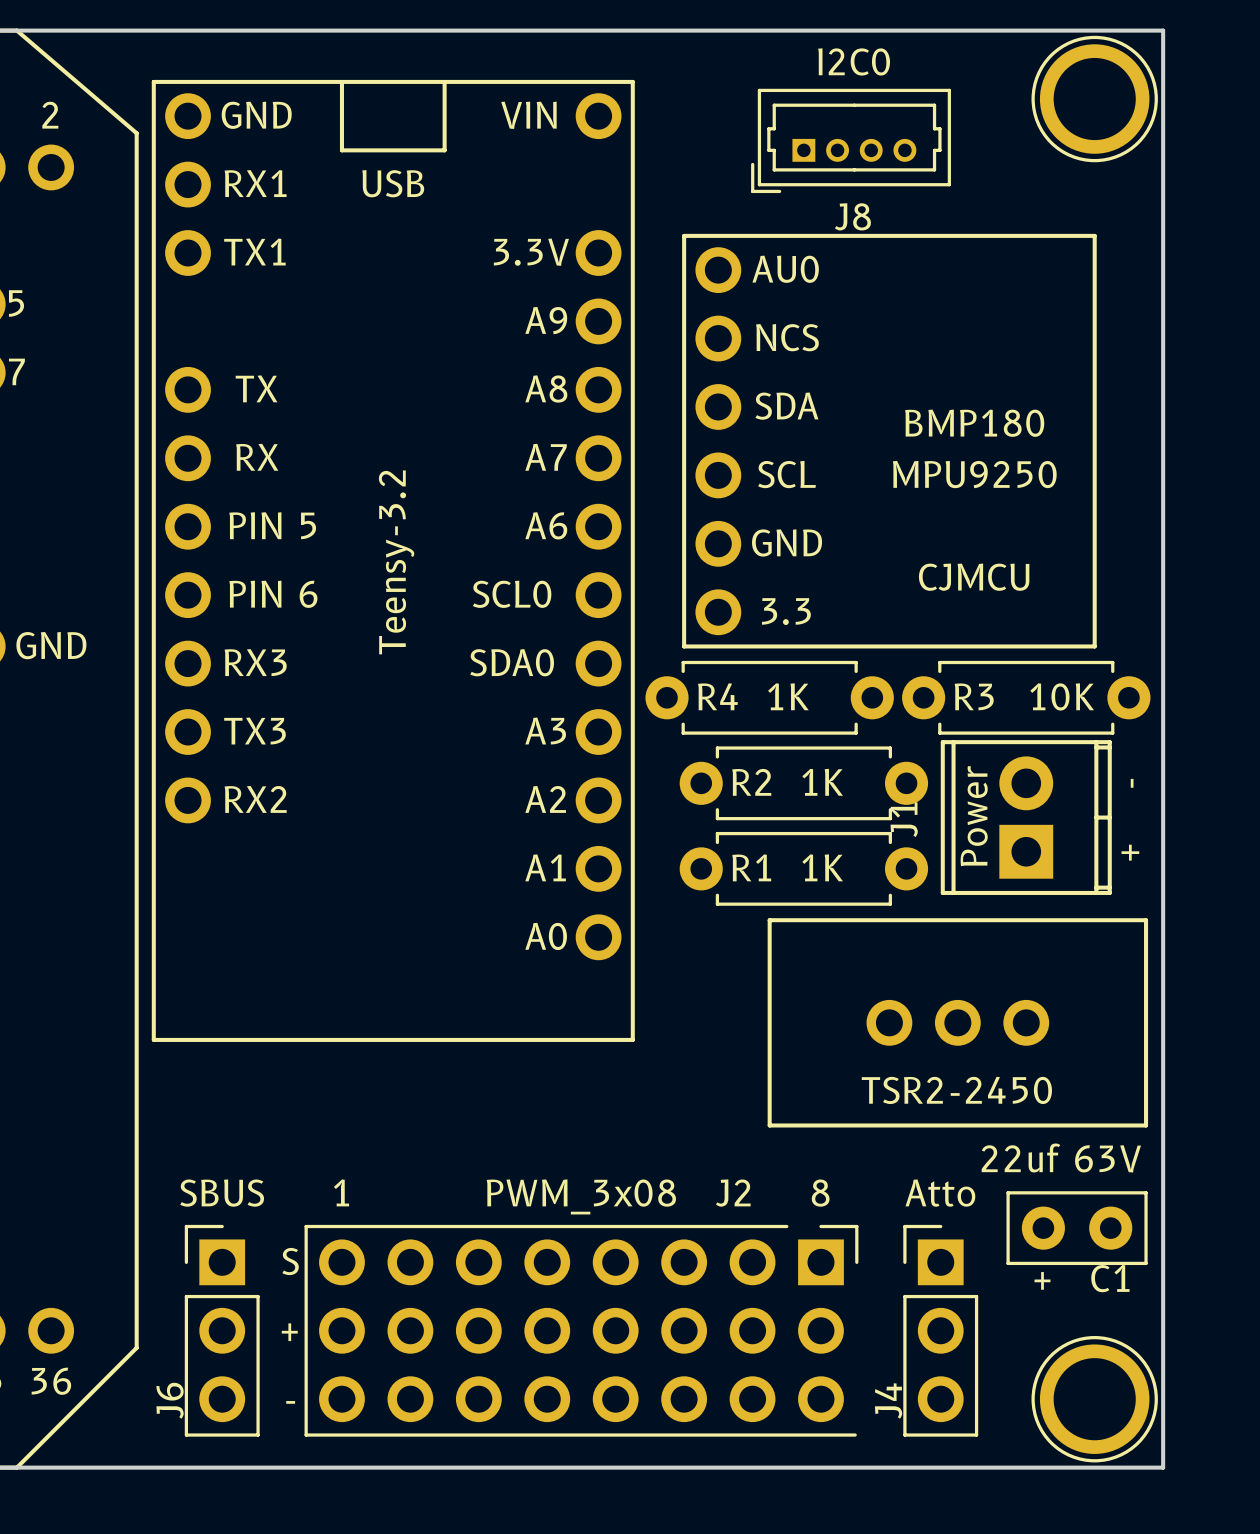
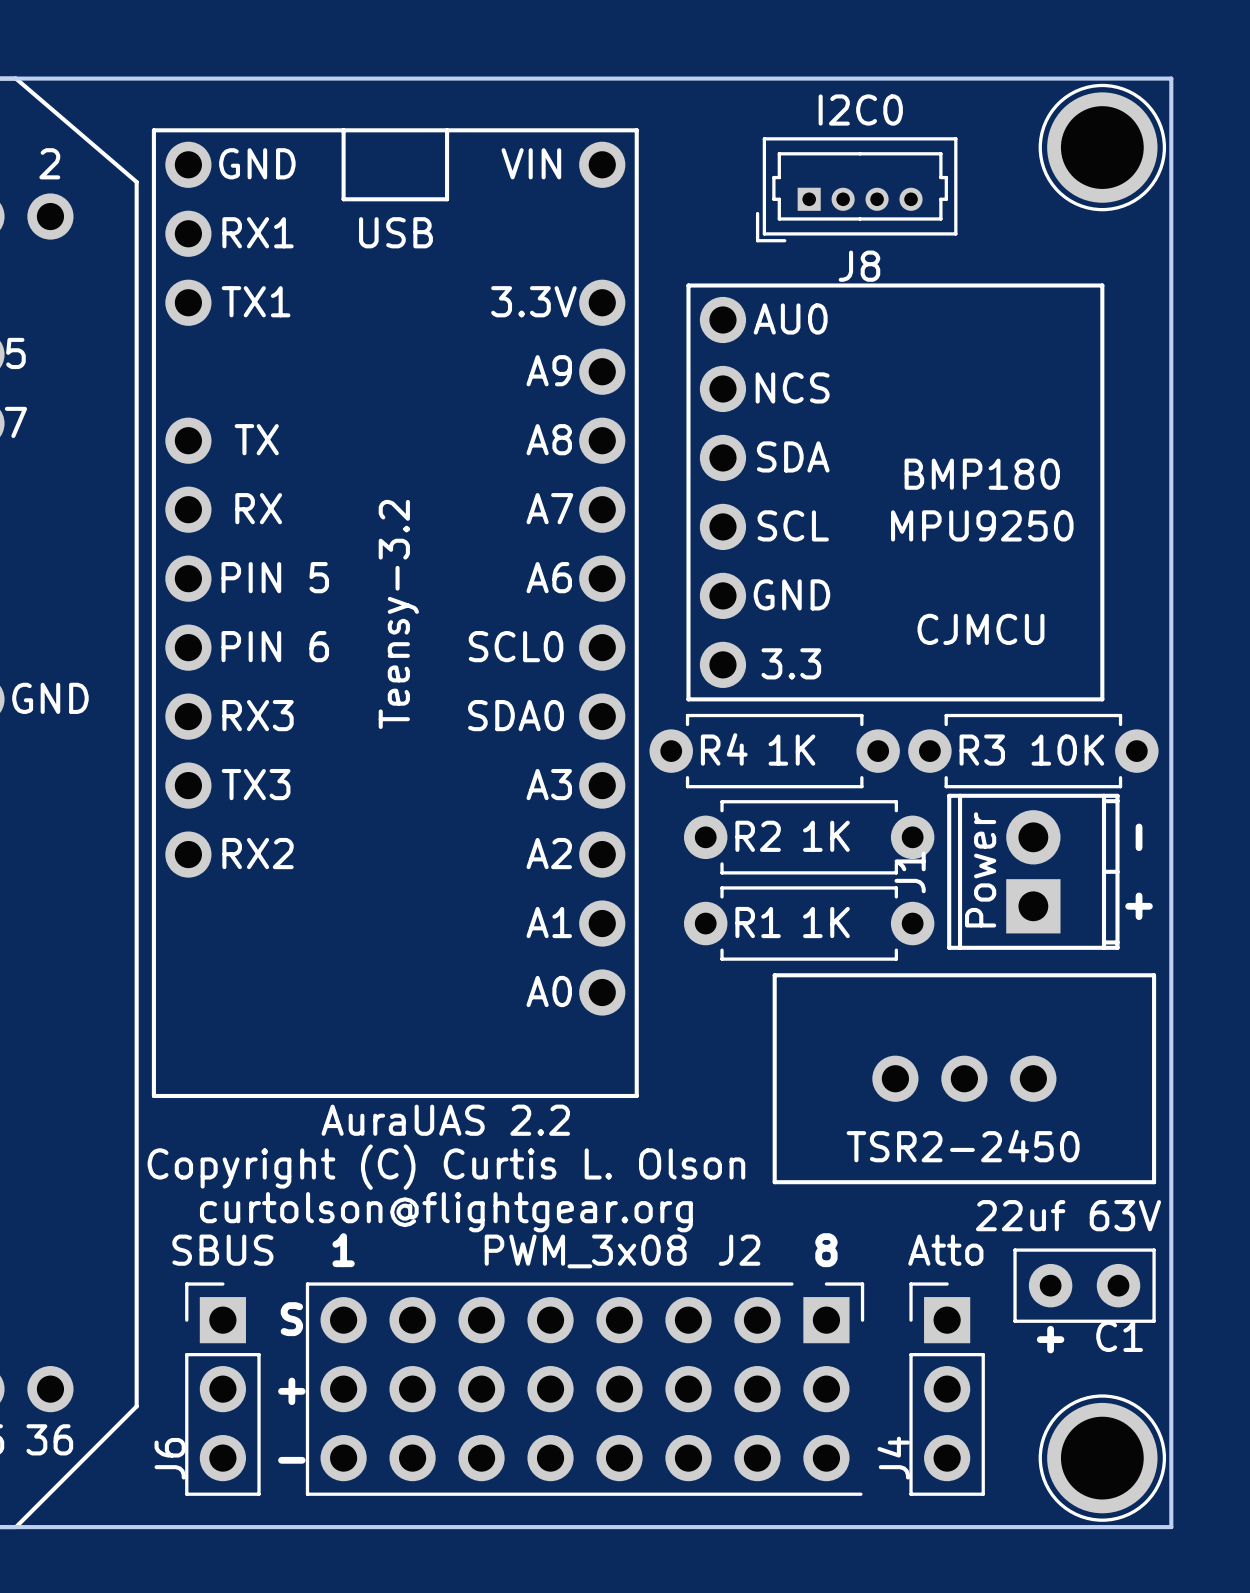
text: none -> AuraUAS 2.2 (445, 1120)
text: none -> Copyright (C) Curtis L. Olson (446, 1167)
text: none -> curtolson@flightgear.org (446, 1212)

